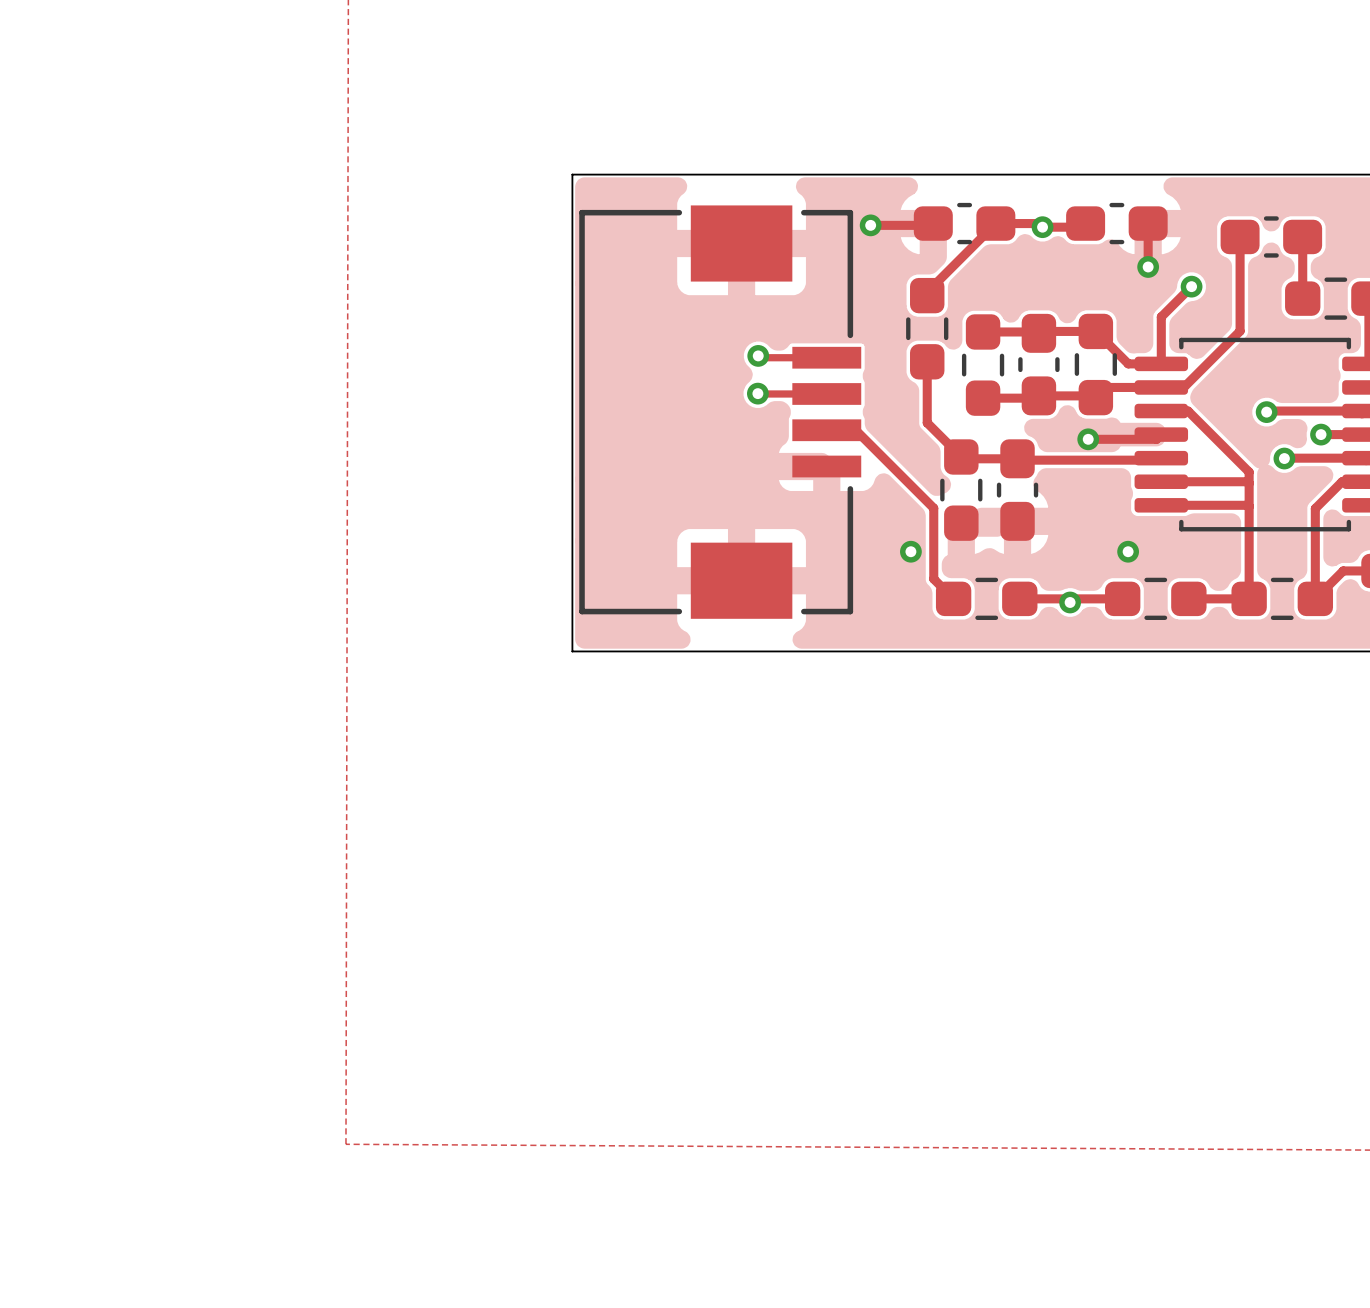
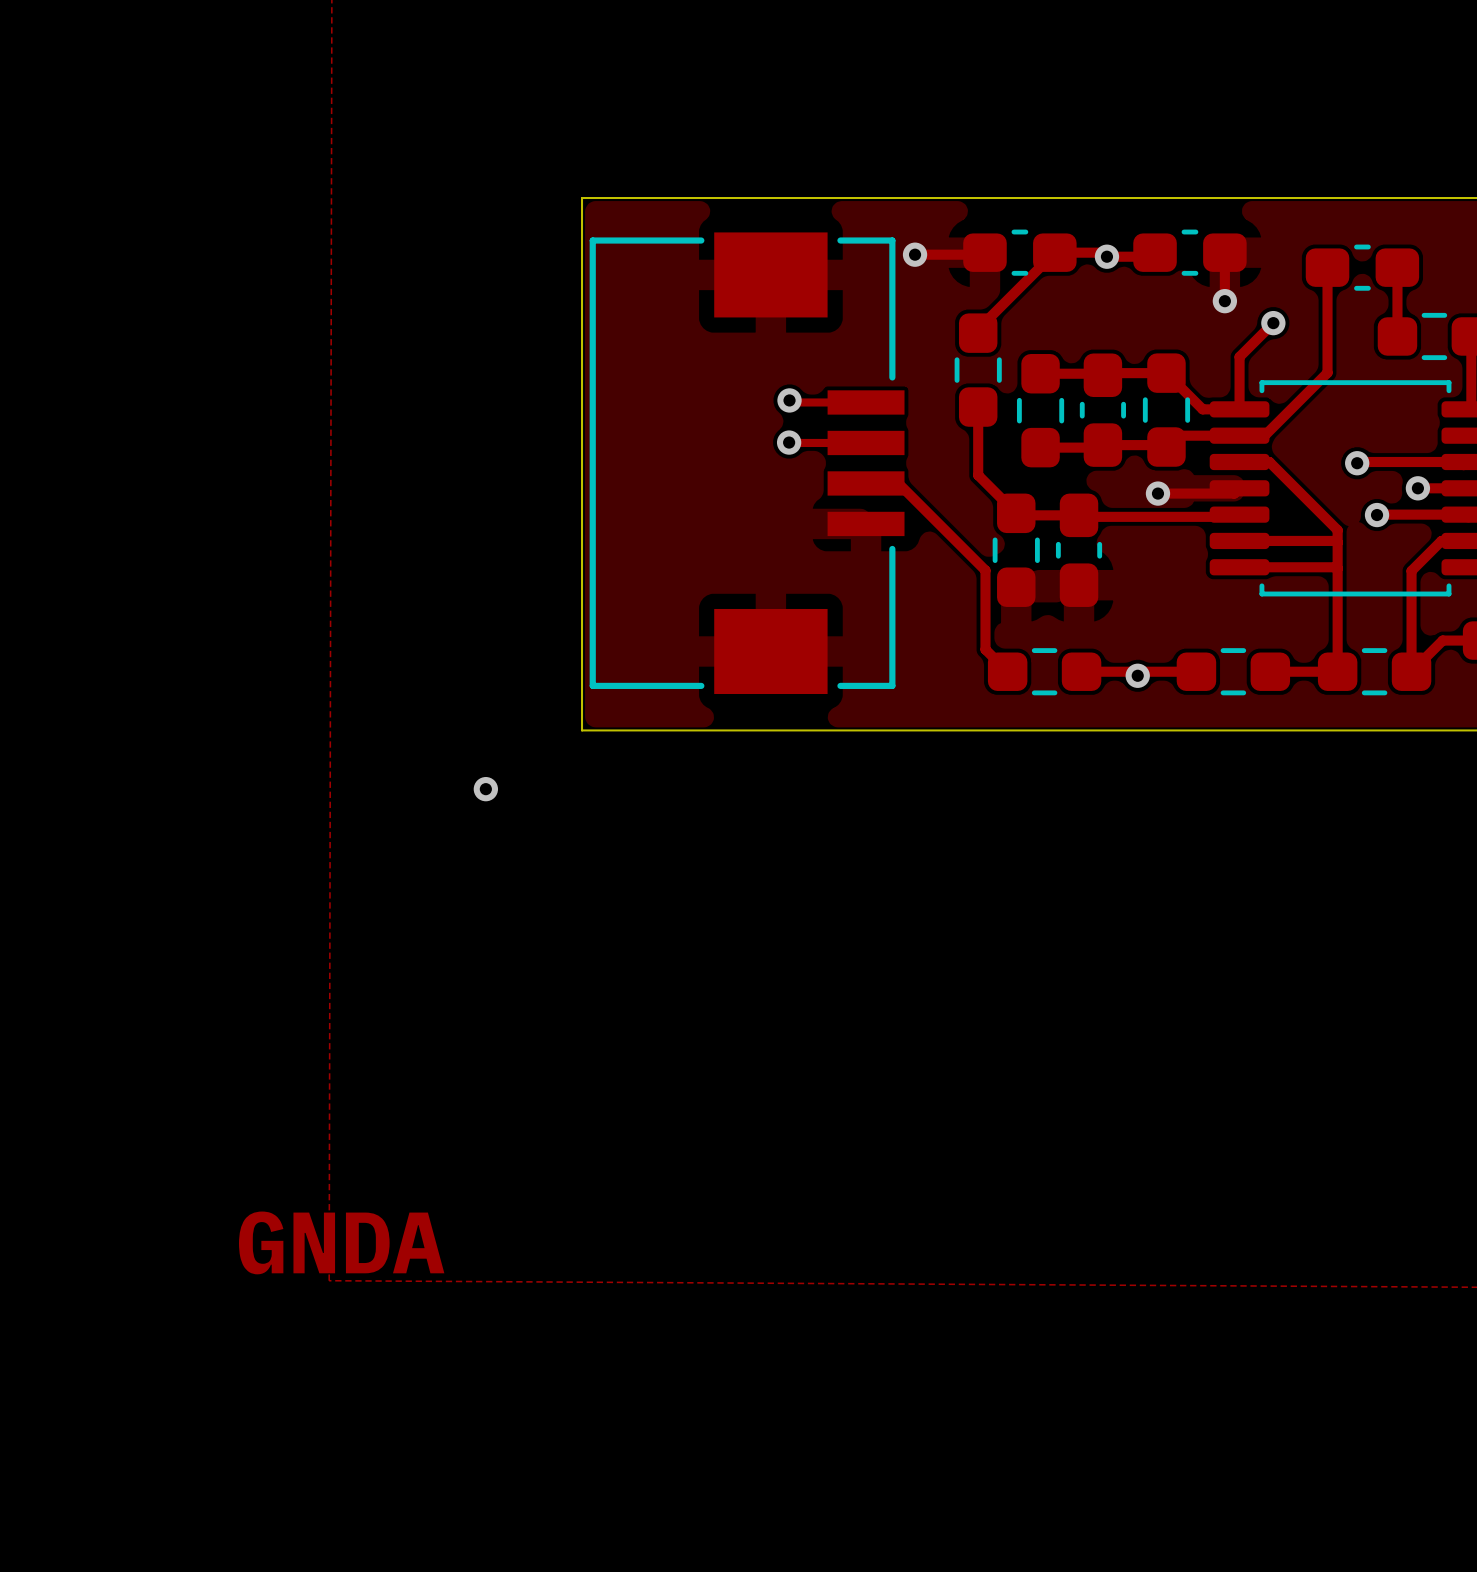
via: (910, 551) -> none
via: (1128, 551) -> none
via: none -> (485, 789)
text: none -> GNDA (341, 1242)

